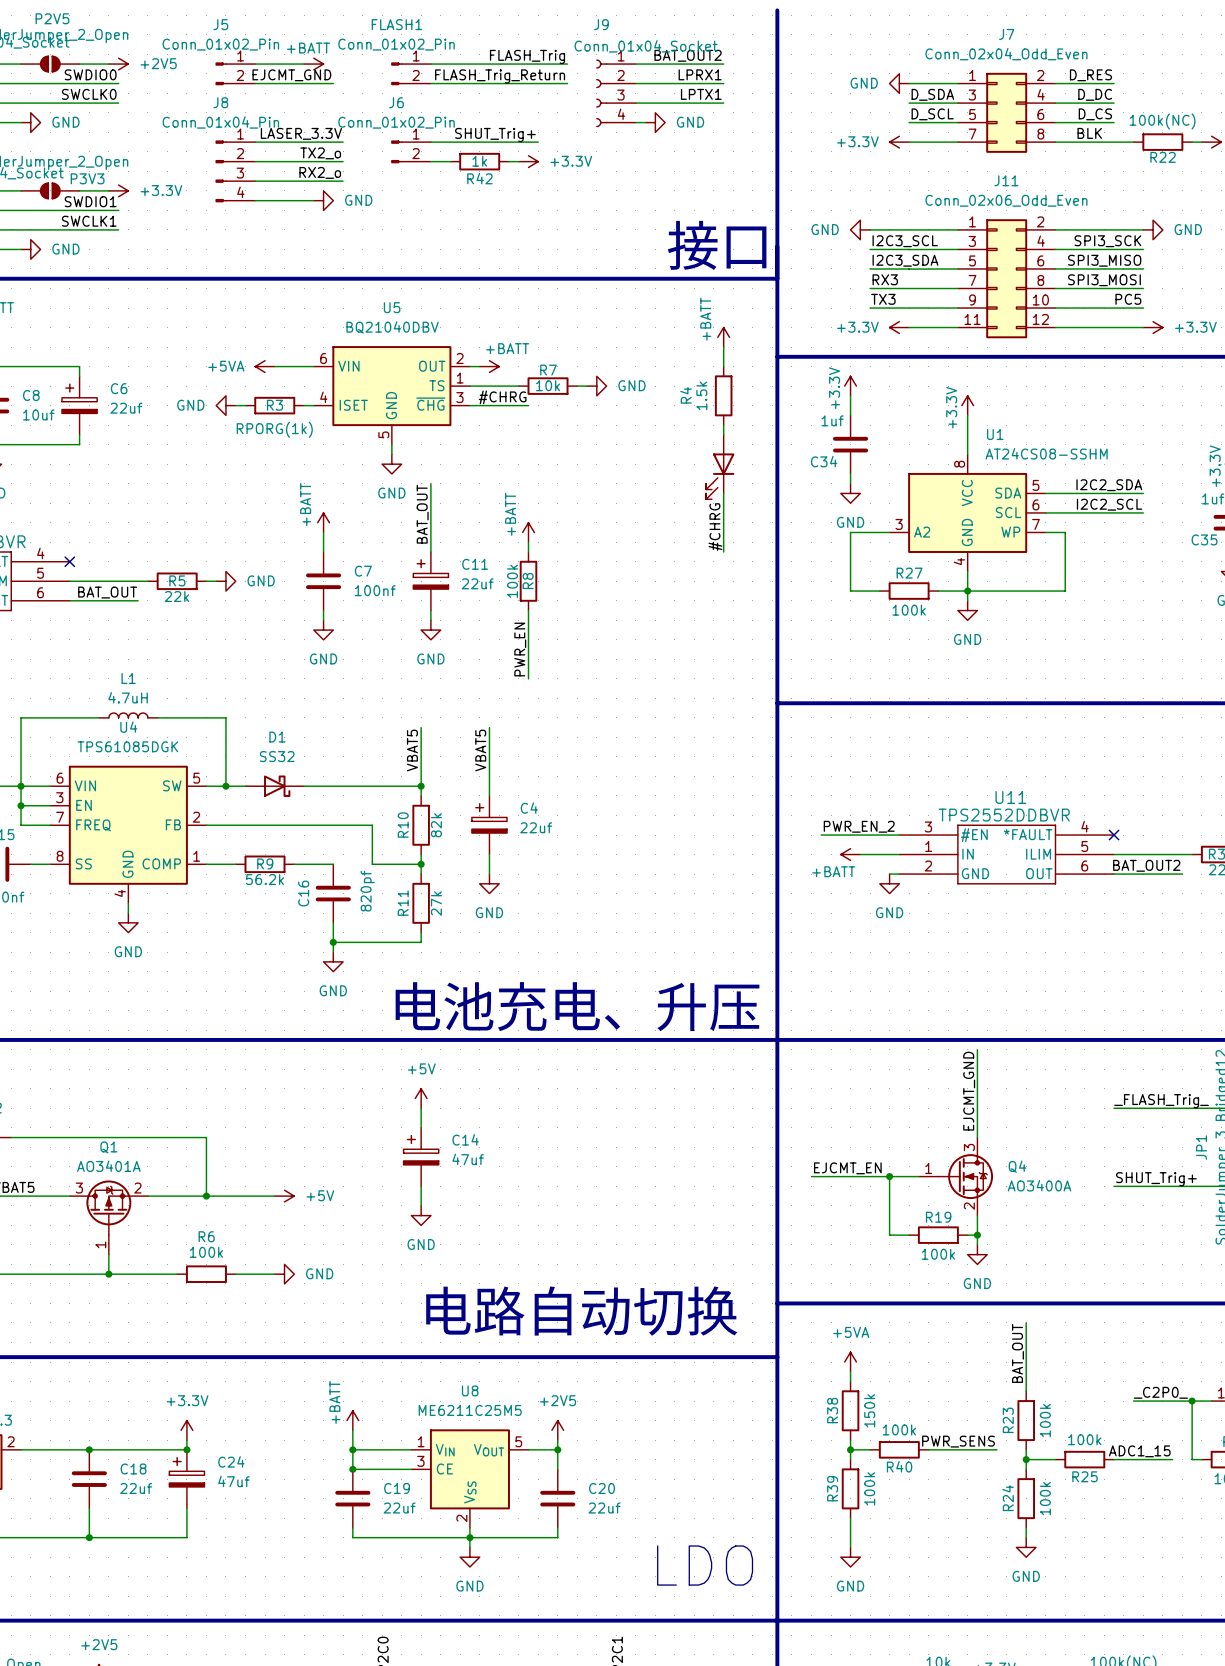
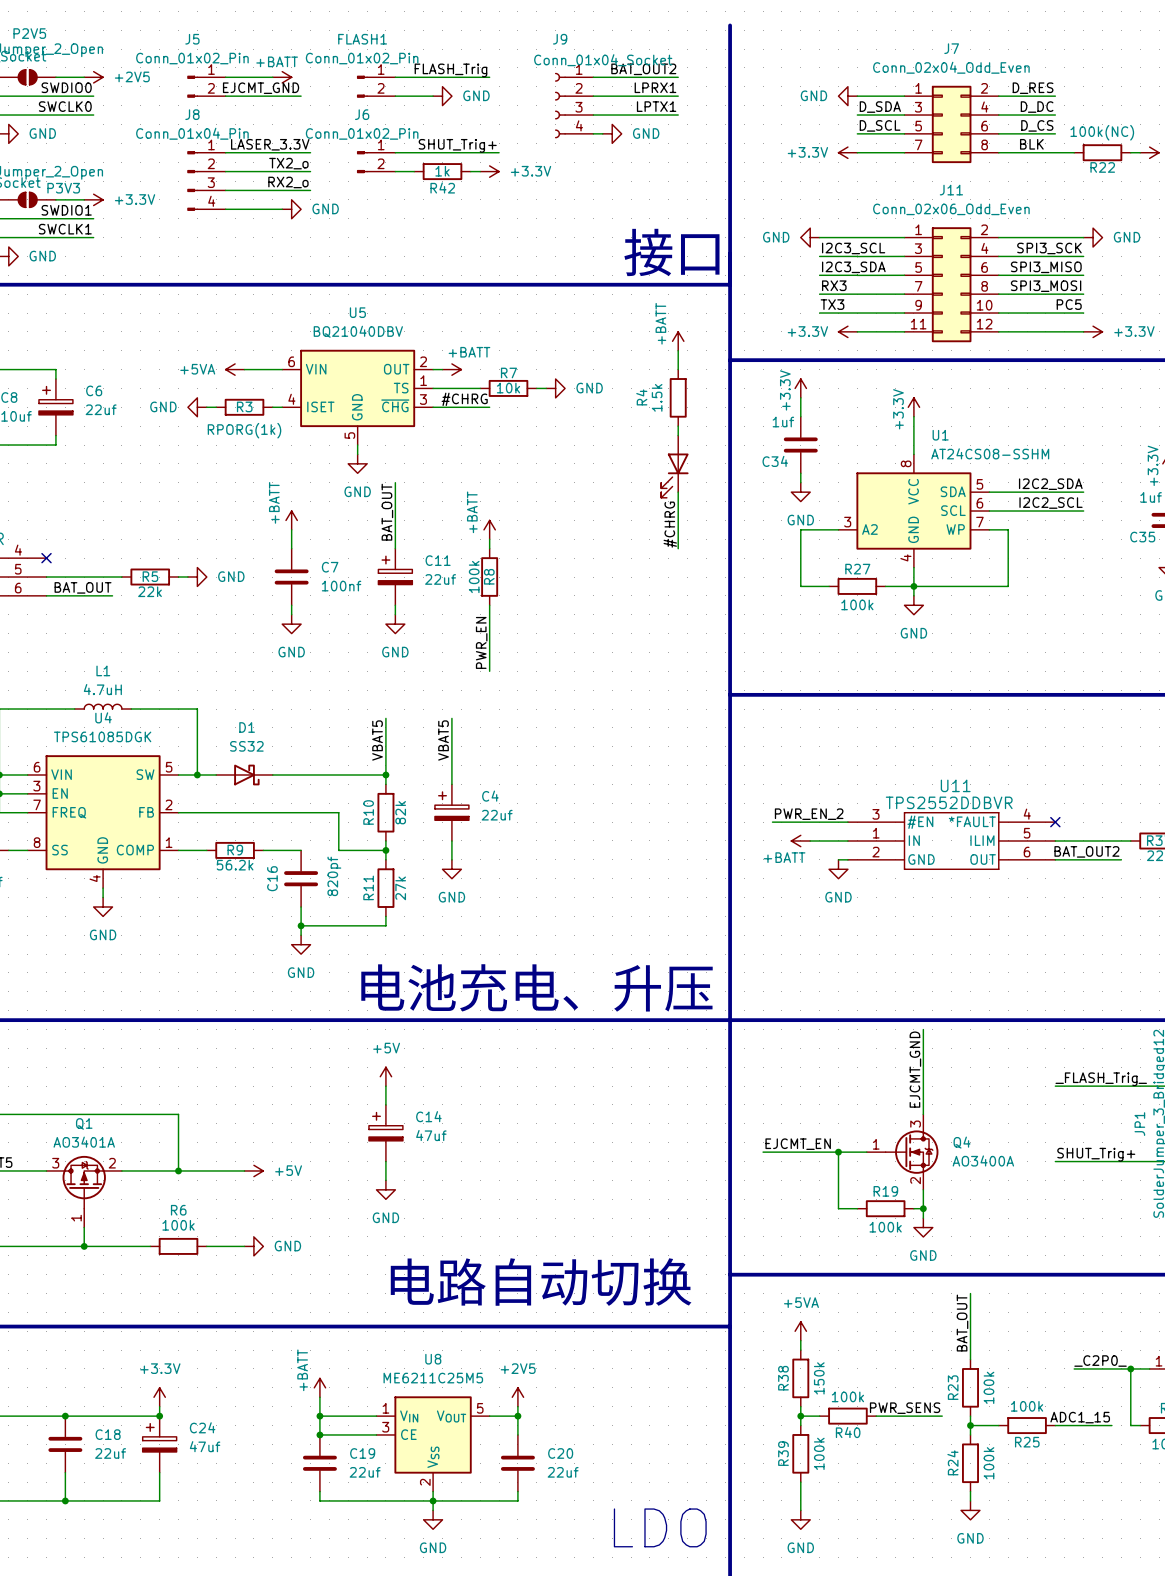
label position: FLASH_Trig (527, 56) -> FLASH_Trig (450, 70)
wire: (528, 64) (567, 64) -> none
label: FLASH_Trig_Return (500, 76) -> none
wire: (469, 83) (567, 83) -> none
power symbol: none -> GND (442, 96)

